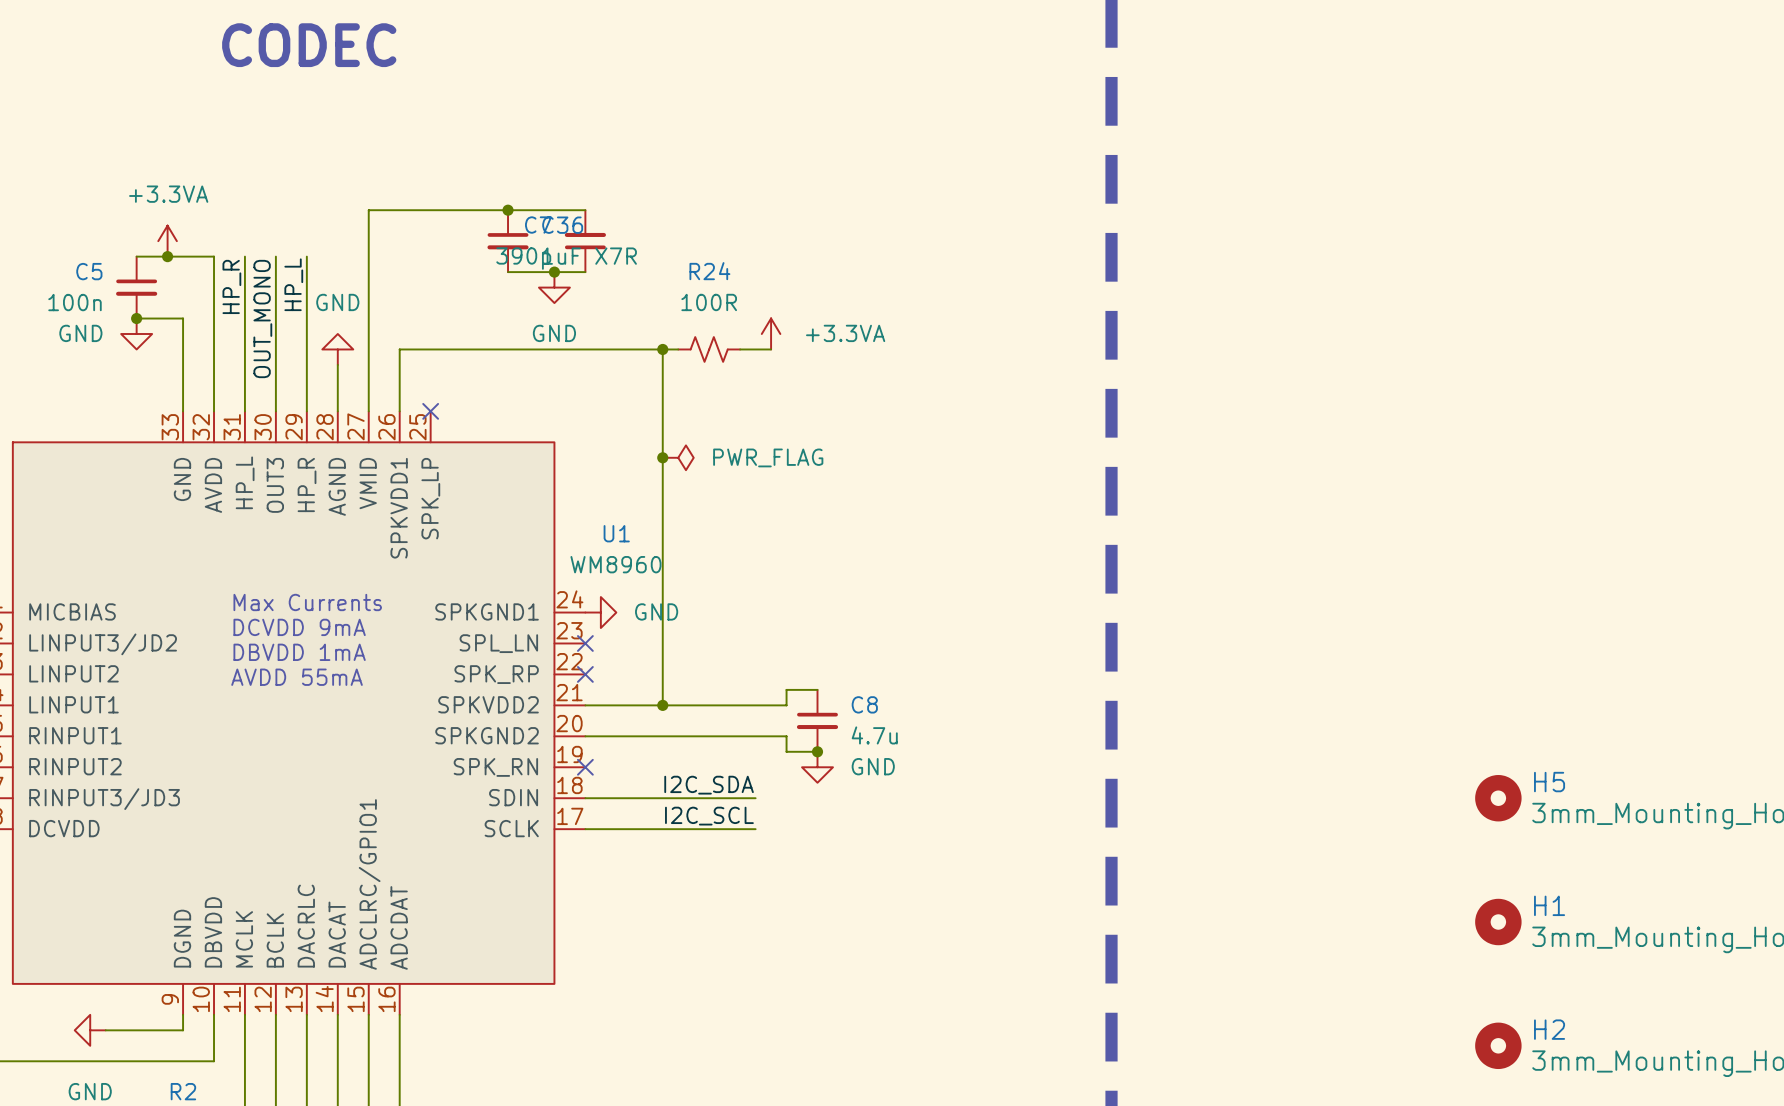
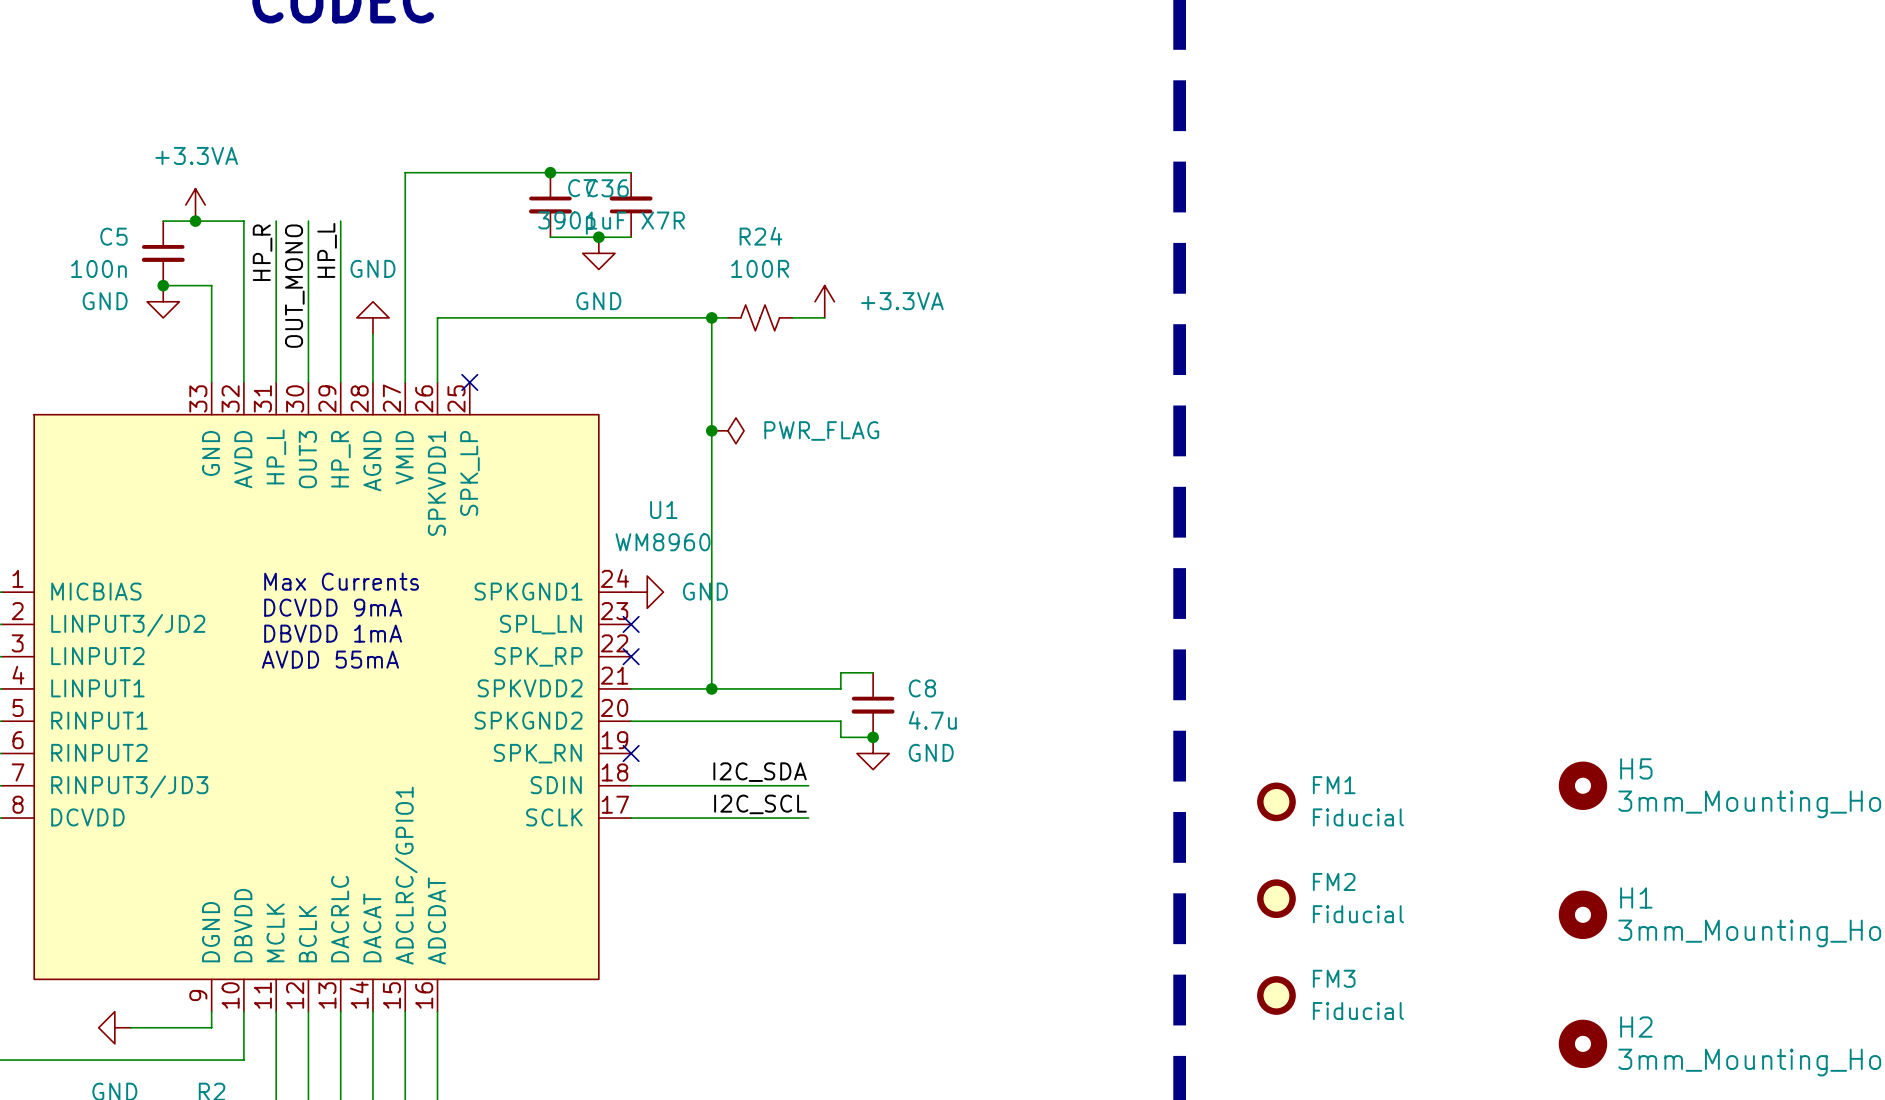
FM1: none -> Fiducial (1276, 801)
FM2: none -> Fiducial (1276, 898)
FM3: none -> Fiducial (1276, 995)

